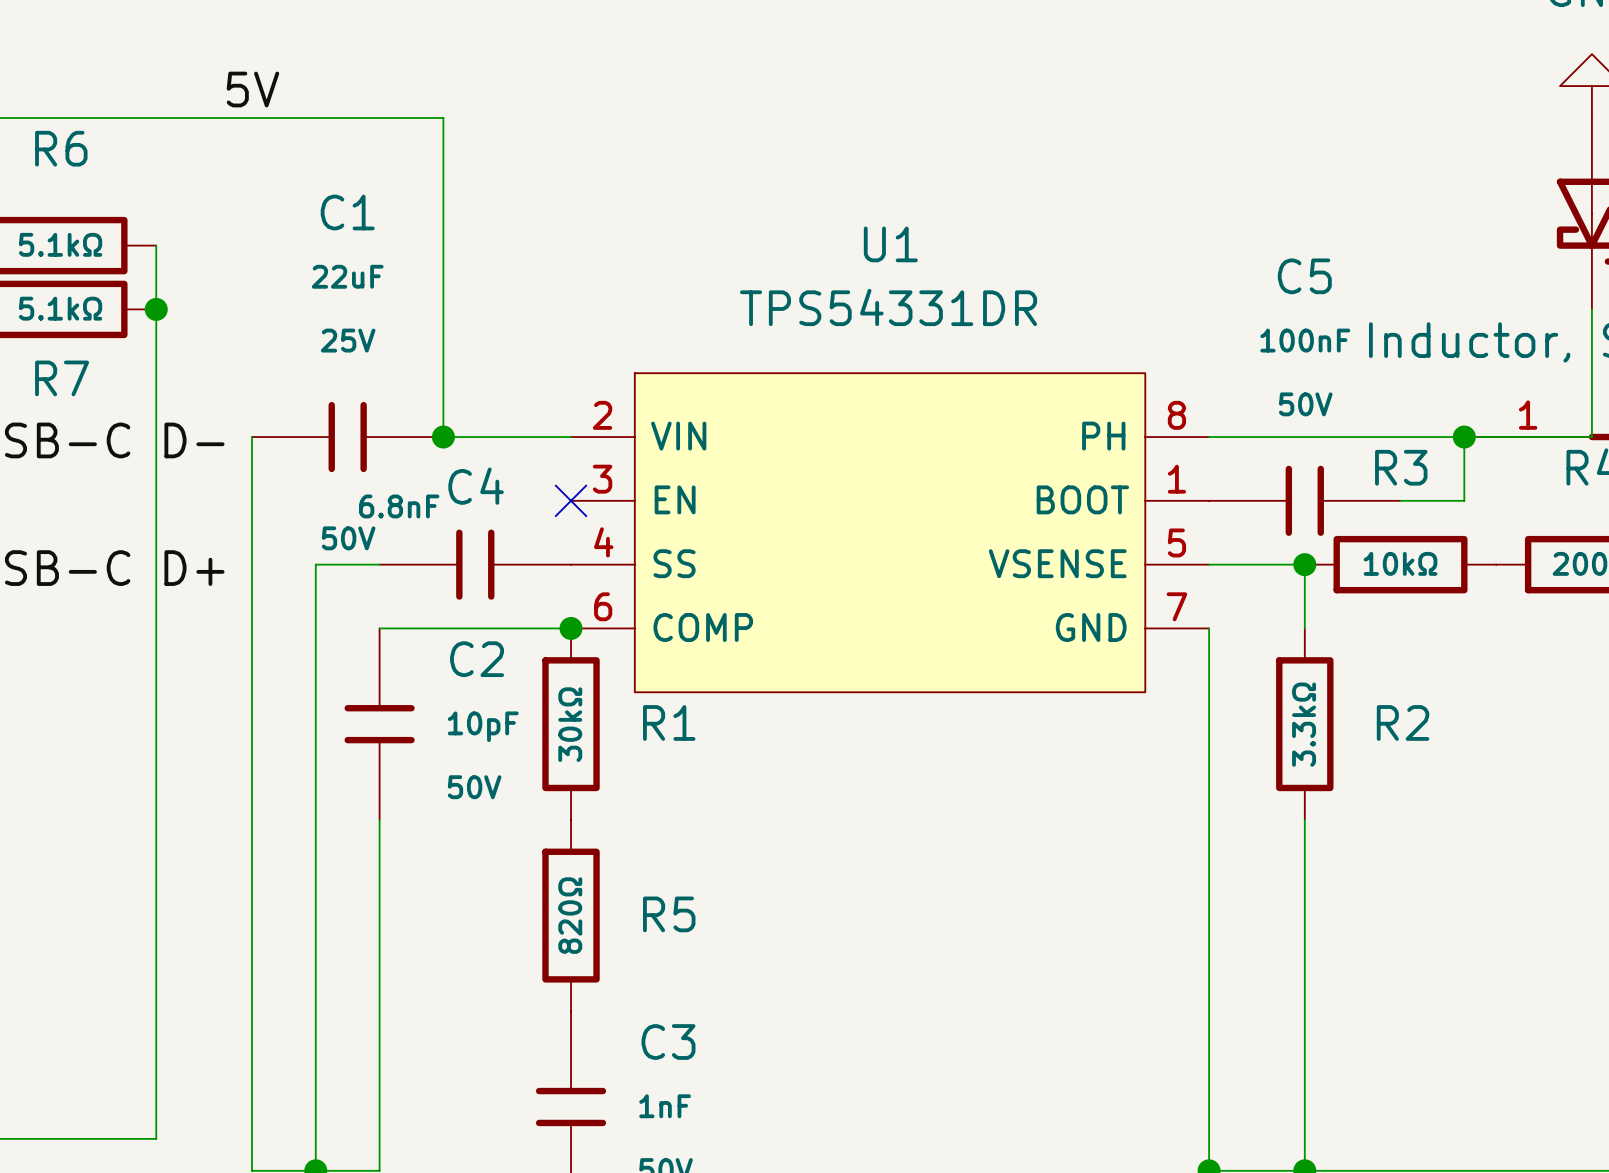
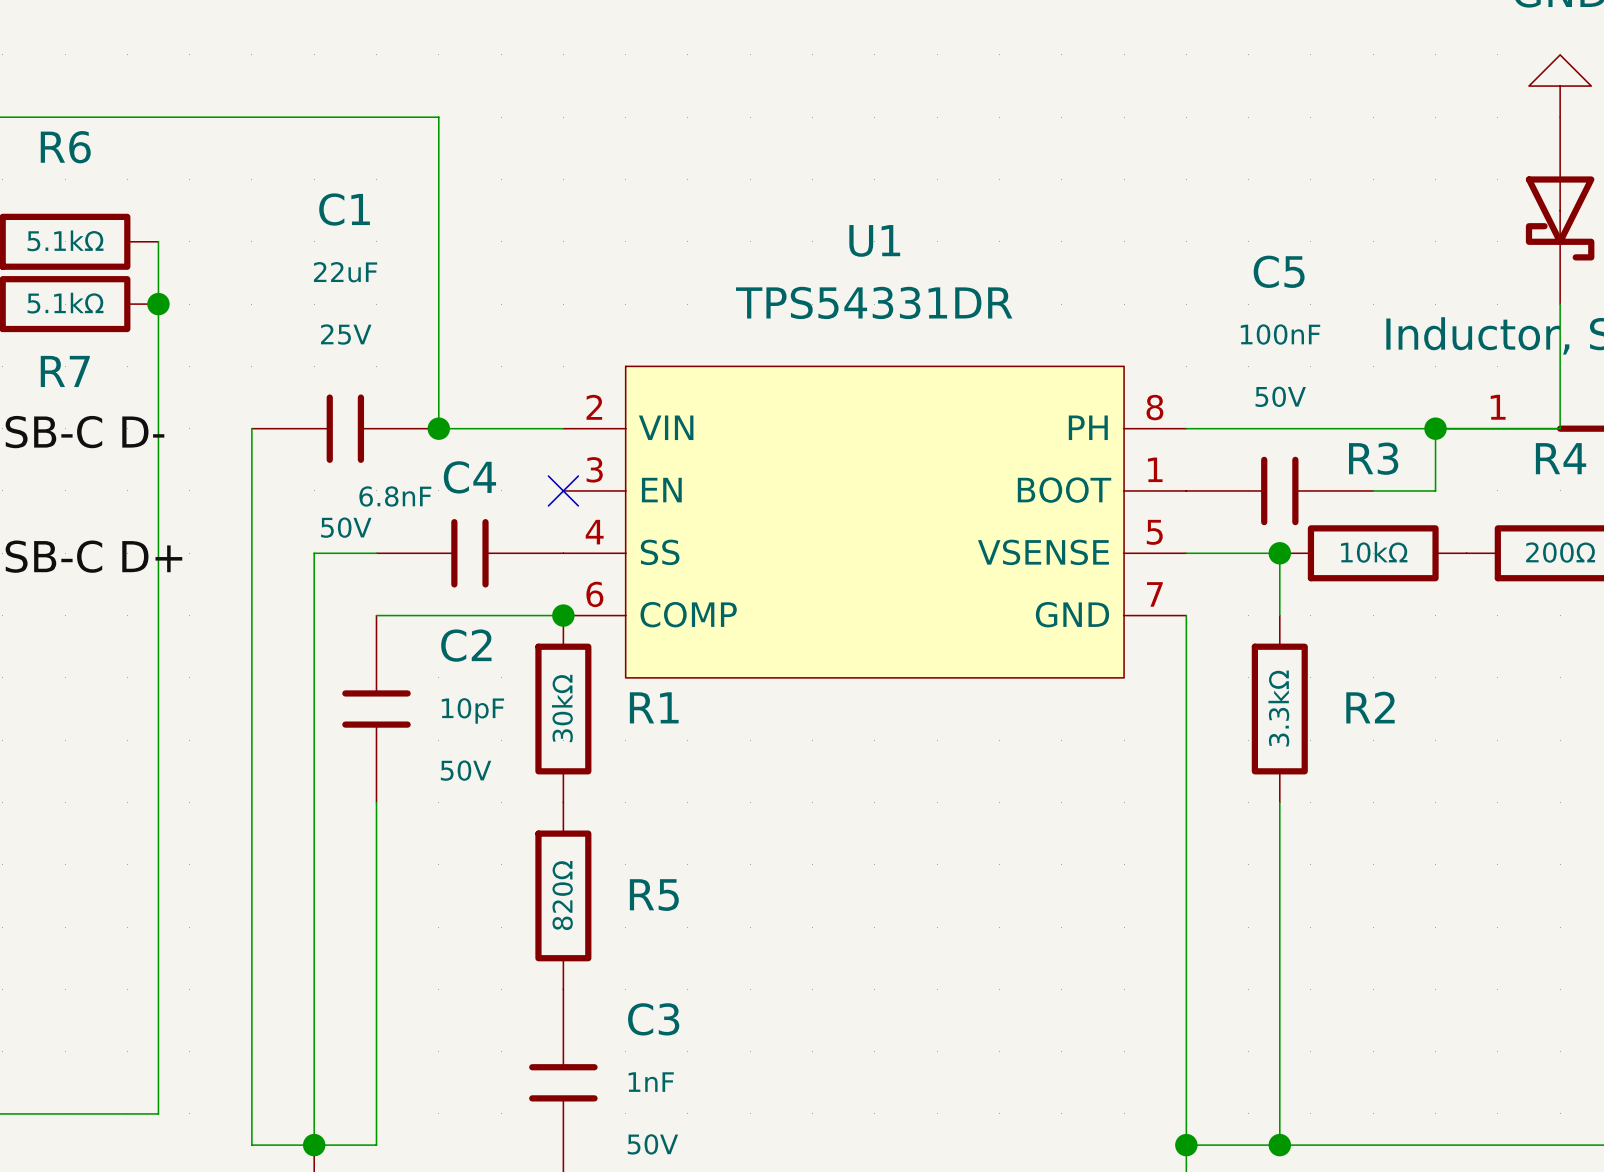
label: 5V (252, 89) -> none

